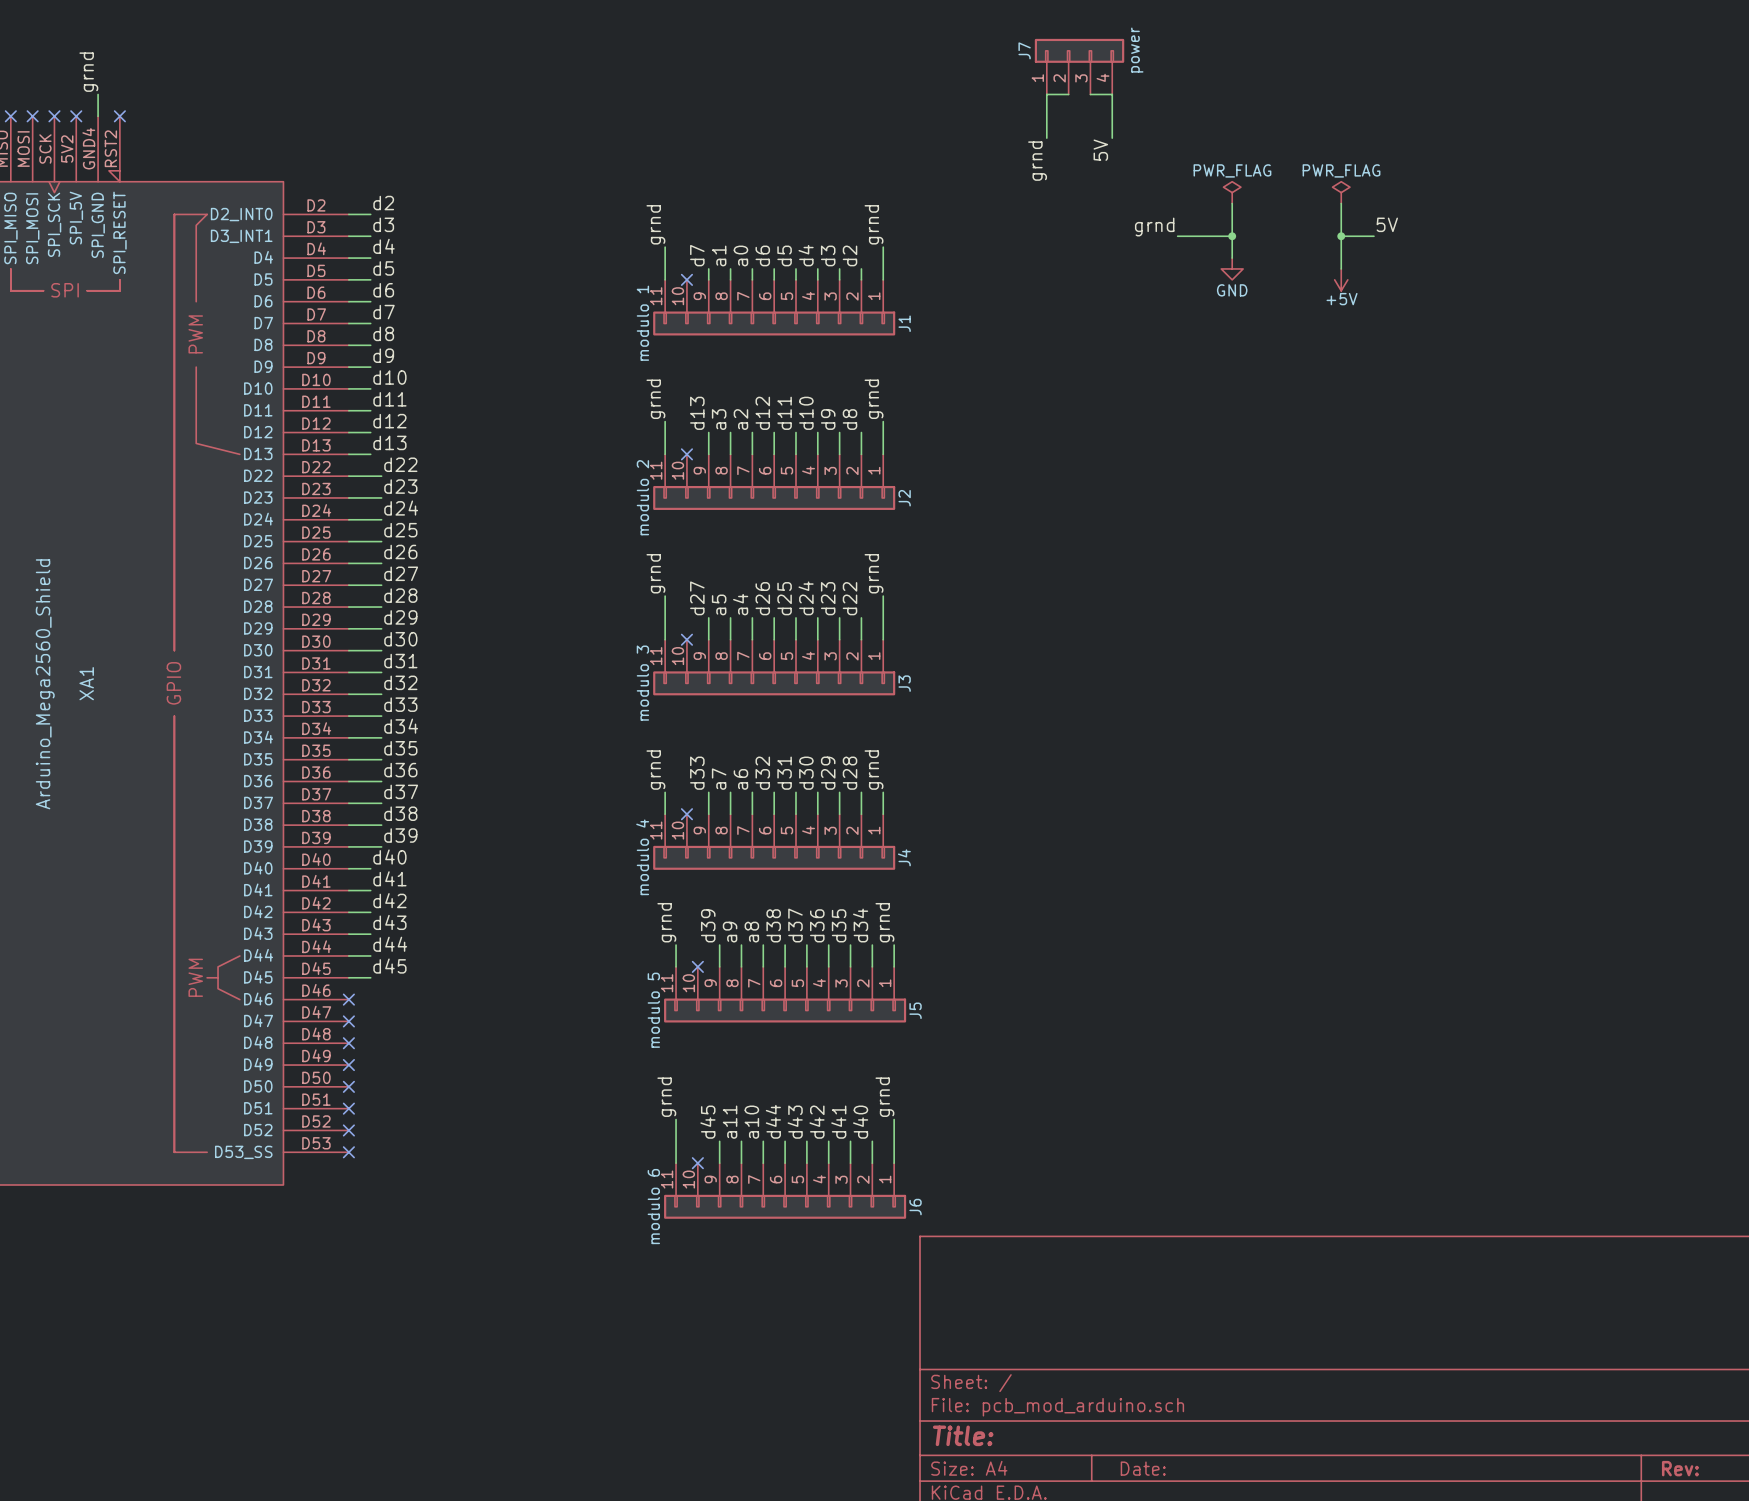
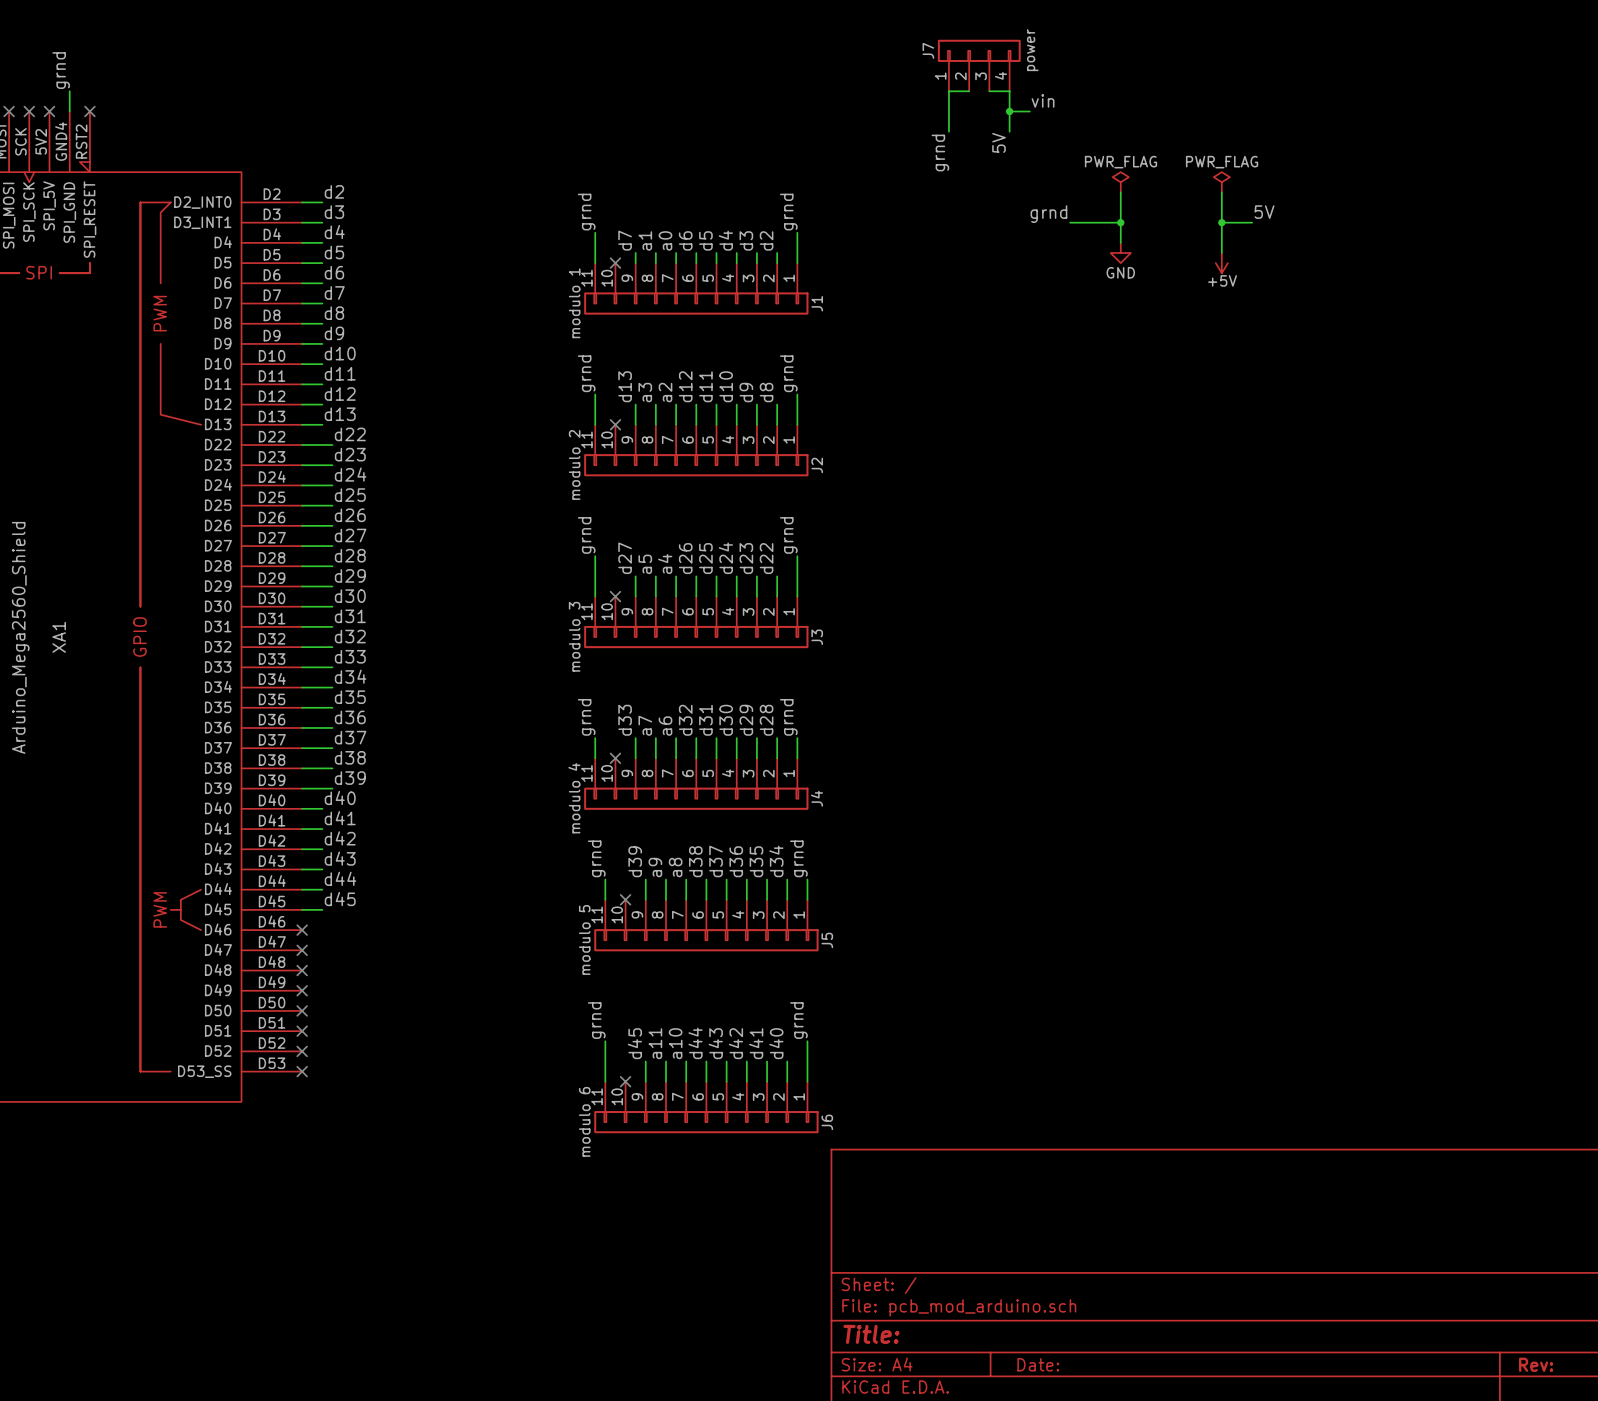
label: none -> vin (1043, 100)
wire: none -> (1009, 111) (1029, 111)
junction: none -> (1009, 111)

